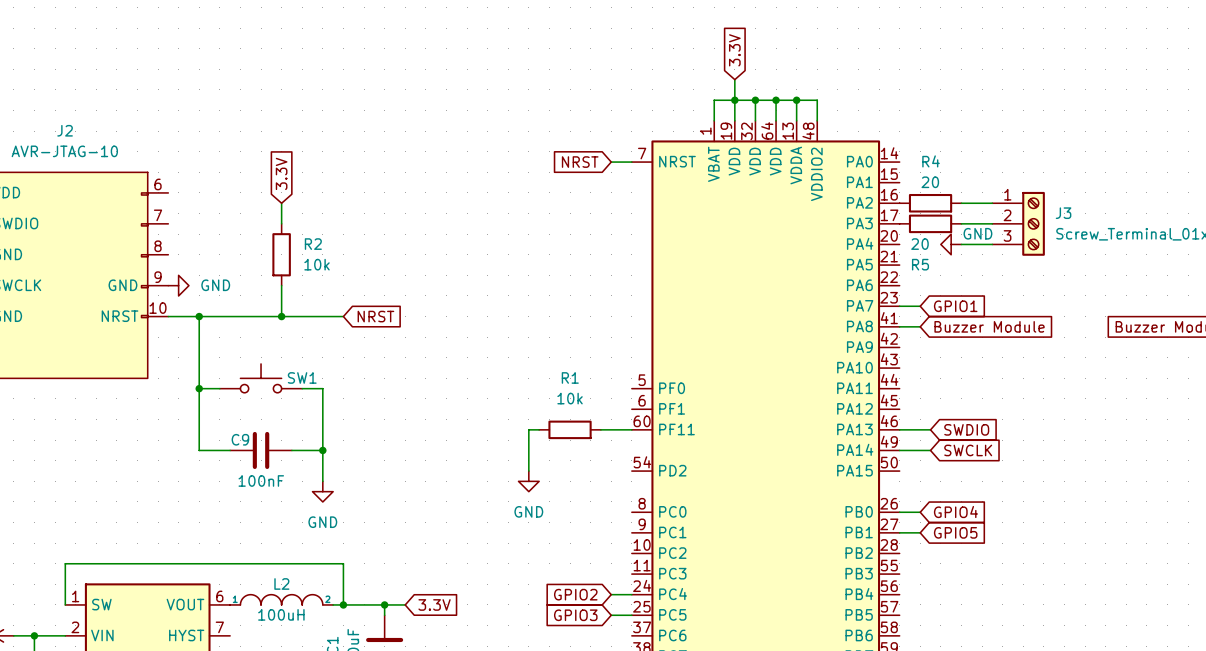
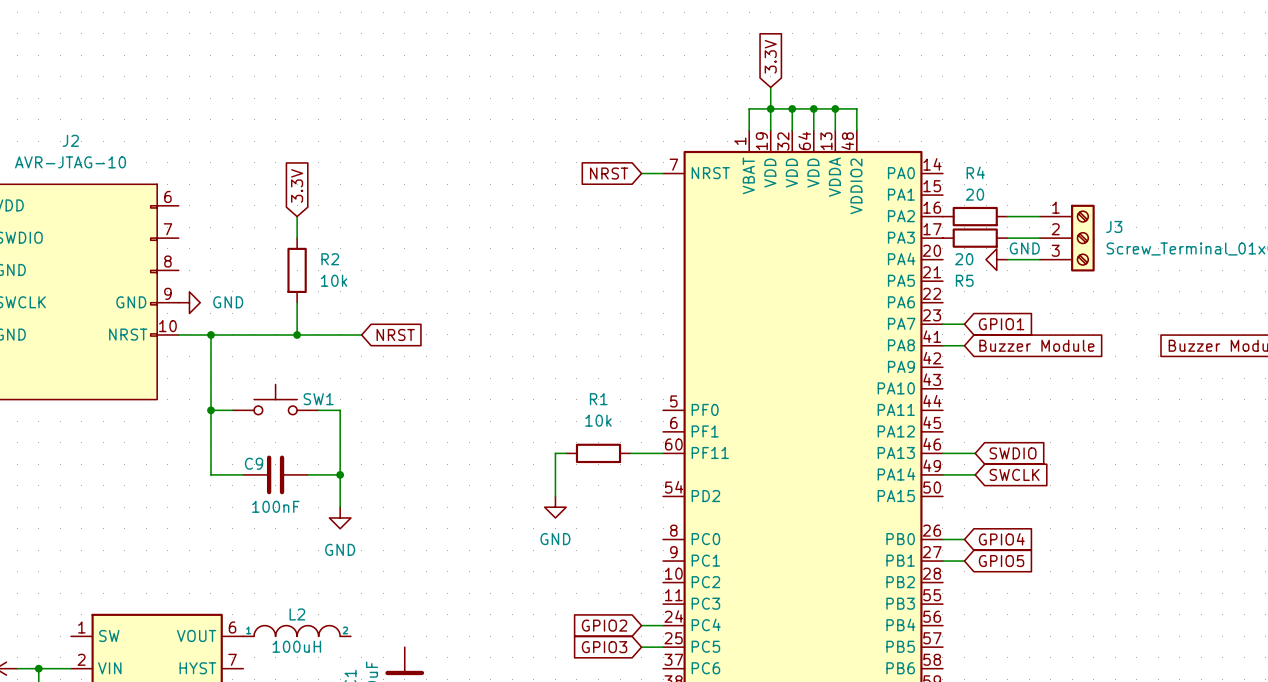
wire: (65, 604) (65, 563) (343, 563) (343, 604) -> none
wire: (333, 604) (405, 604) -> none
junction: (343, 604) -> none
wire: (384, 604) (384, 615) -> none
junction: (384, 604) -> none
global label: 3.3V (434, 604) -> none

